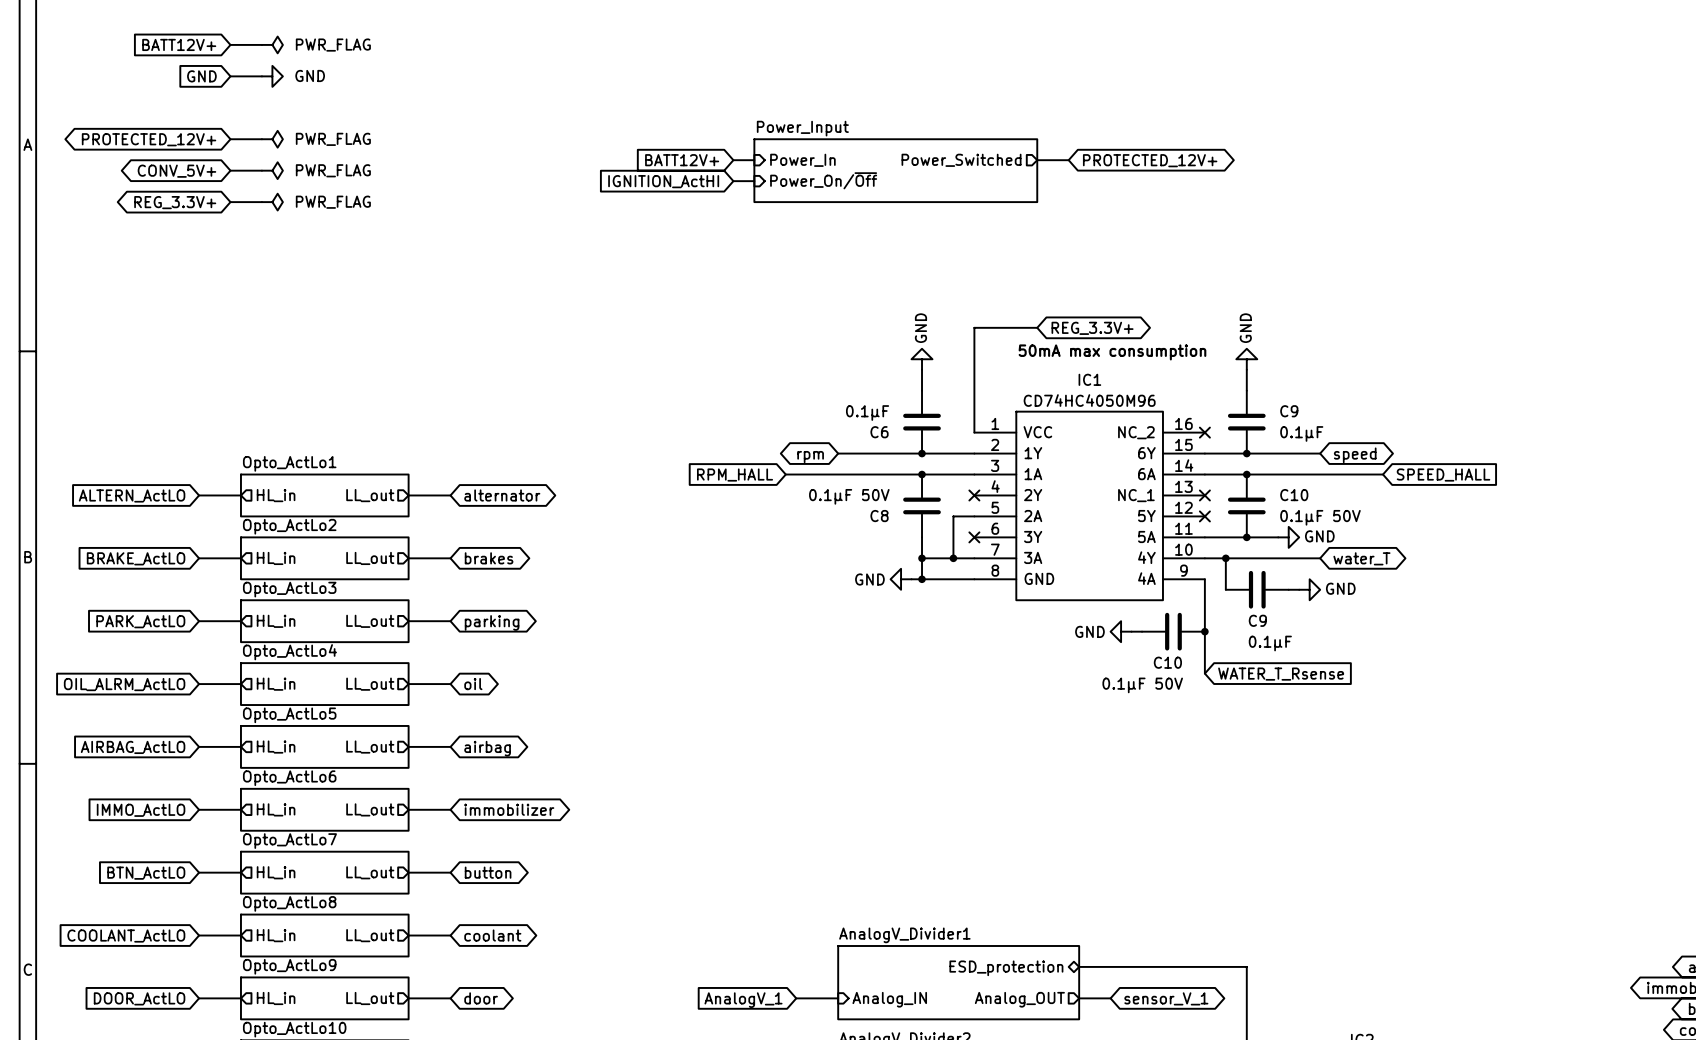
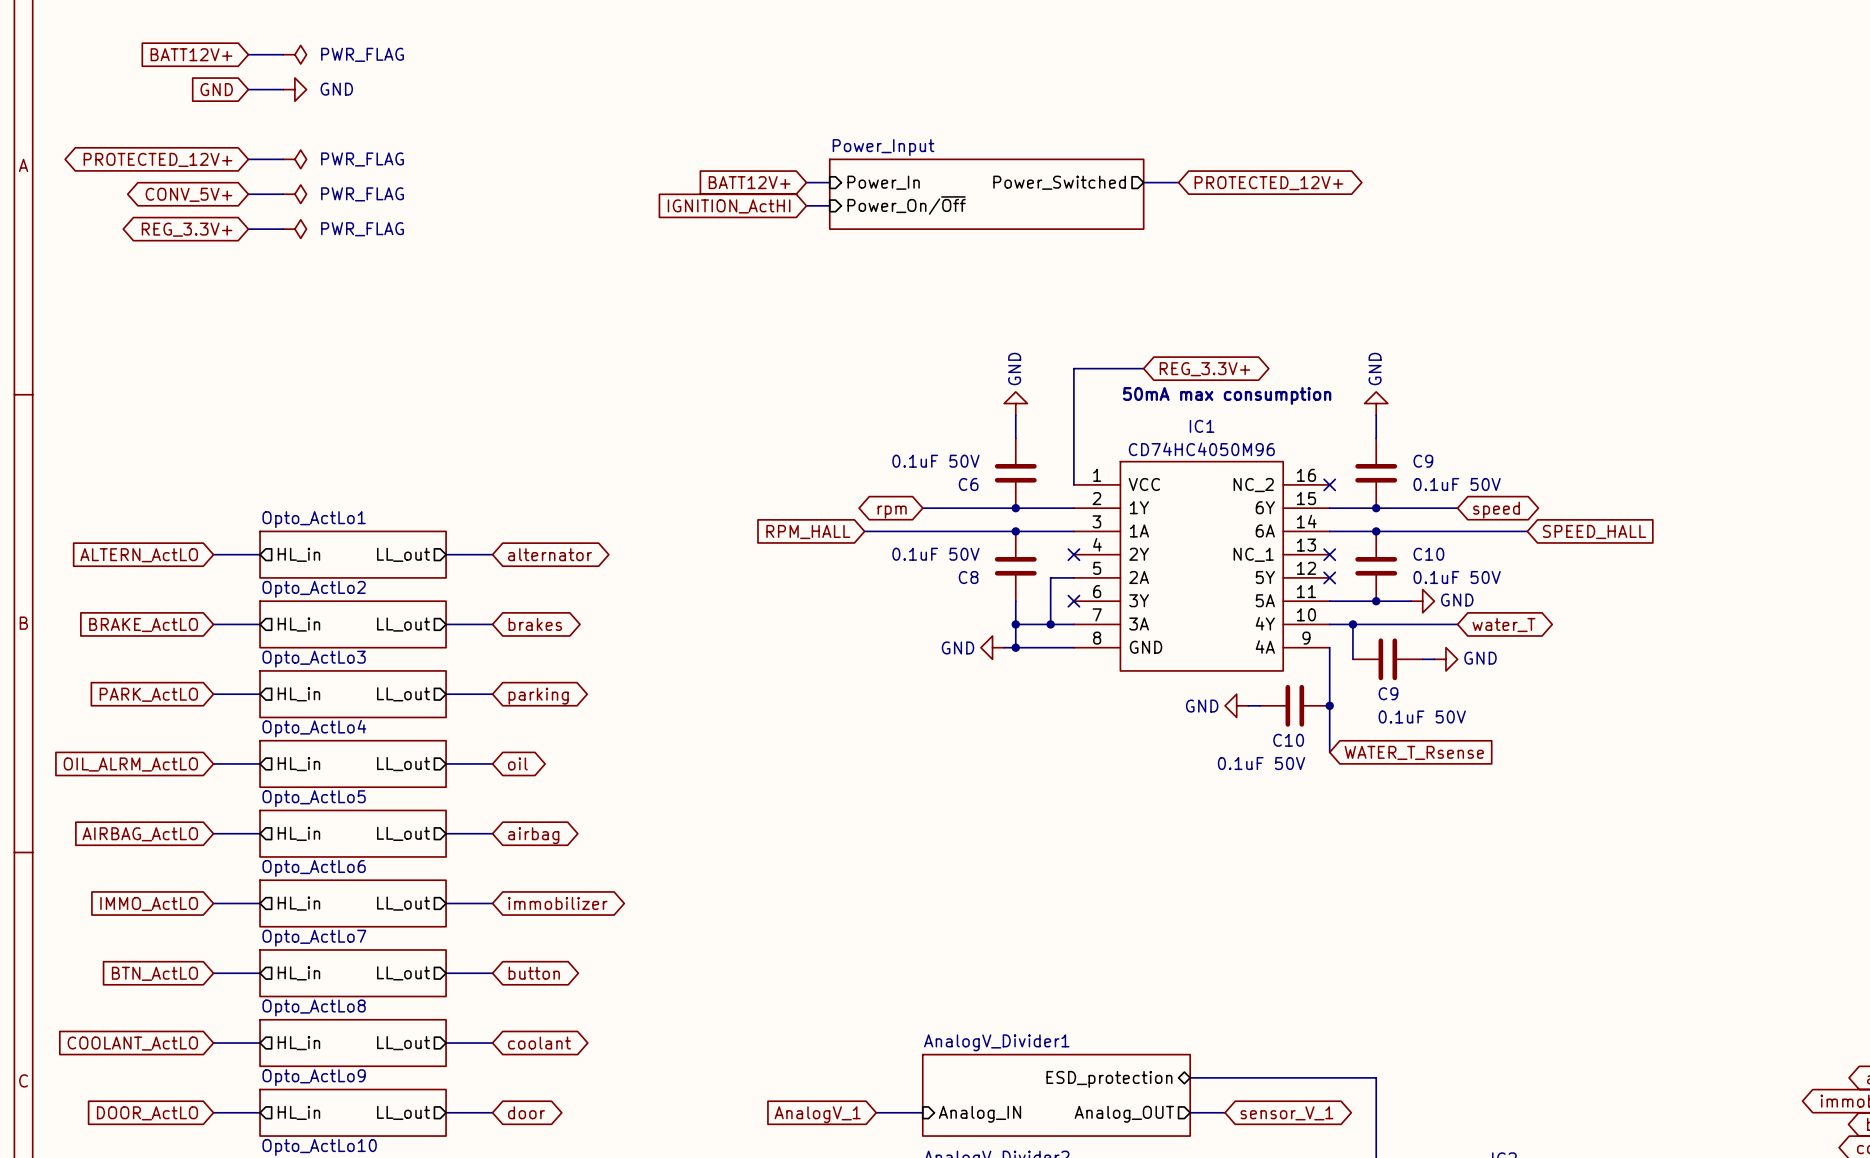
C6 value: 0.1µF (867, 413) -> 0.1uF 50V (935, 461)
C9 value: 0.1µF (1301, 433) -> 0.1uF 50V (1457, 484)
C8 value: 0.1µF 50V (849, 496) -> 0.1uF 50V (935, 554)
C10 value: 0.1µF 50V (1320, 517) -> 0.1uF 50V (1457, 577)
C9 value: 0.1µF (1270, 643) -> 0.1uF 50V (1422, 717)
C10 value: 0.1µF 50V (1142, 685) -> 0.1uF 50V (1261, 763)

